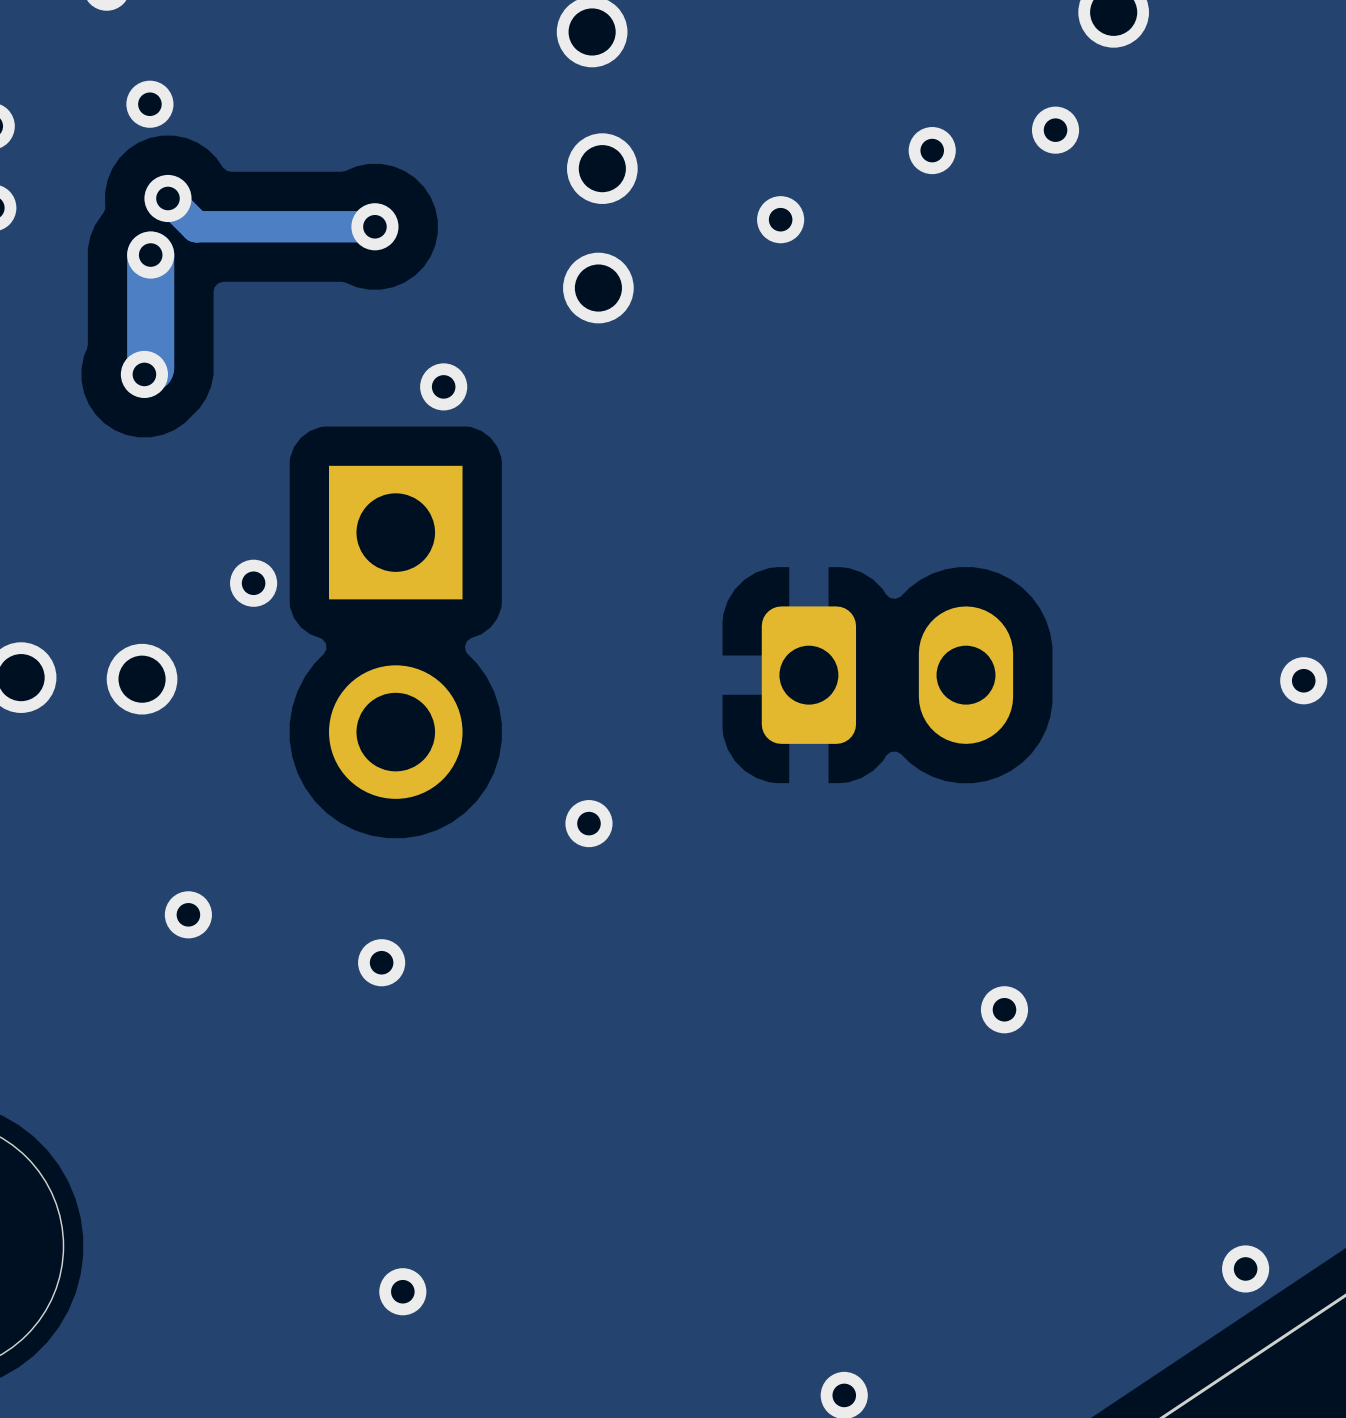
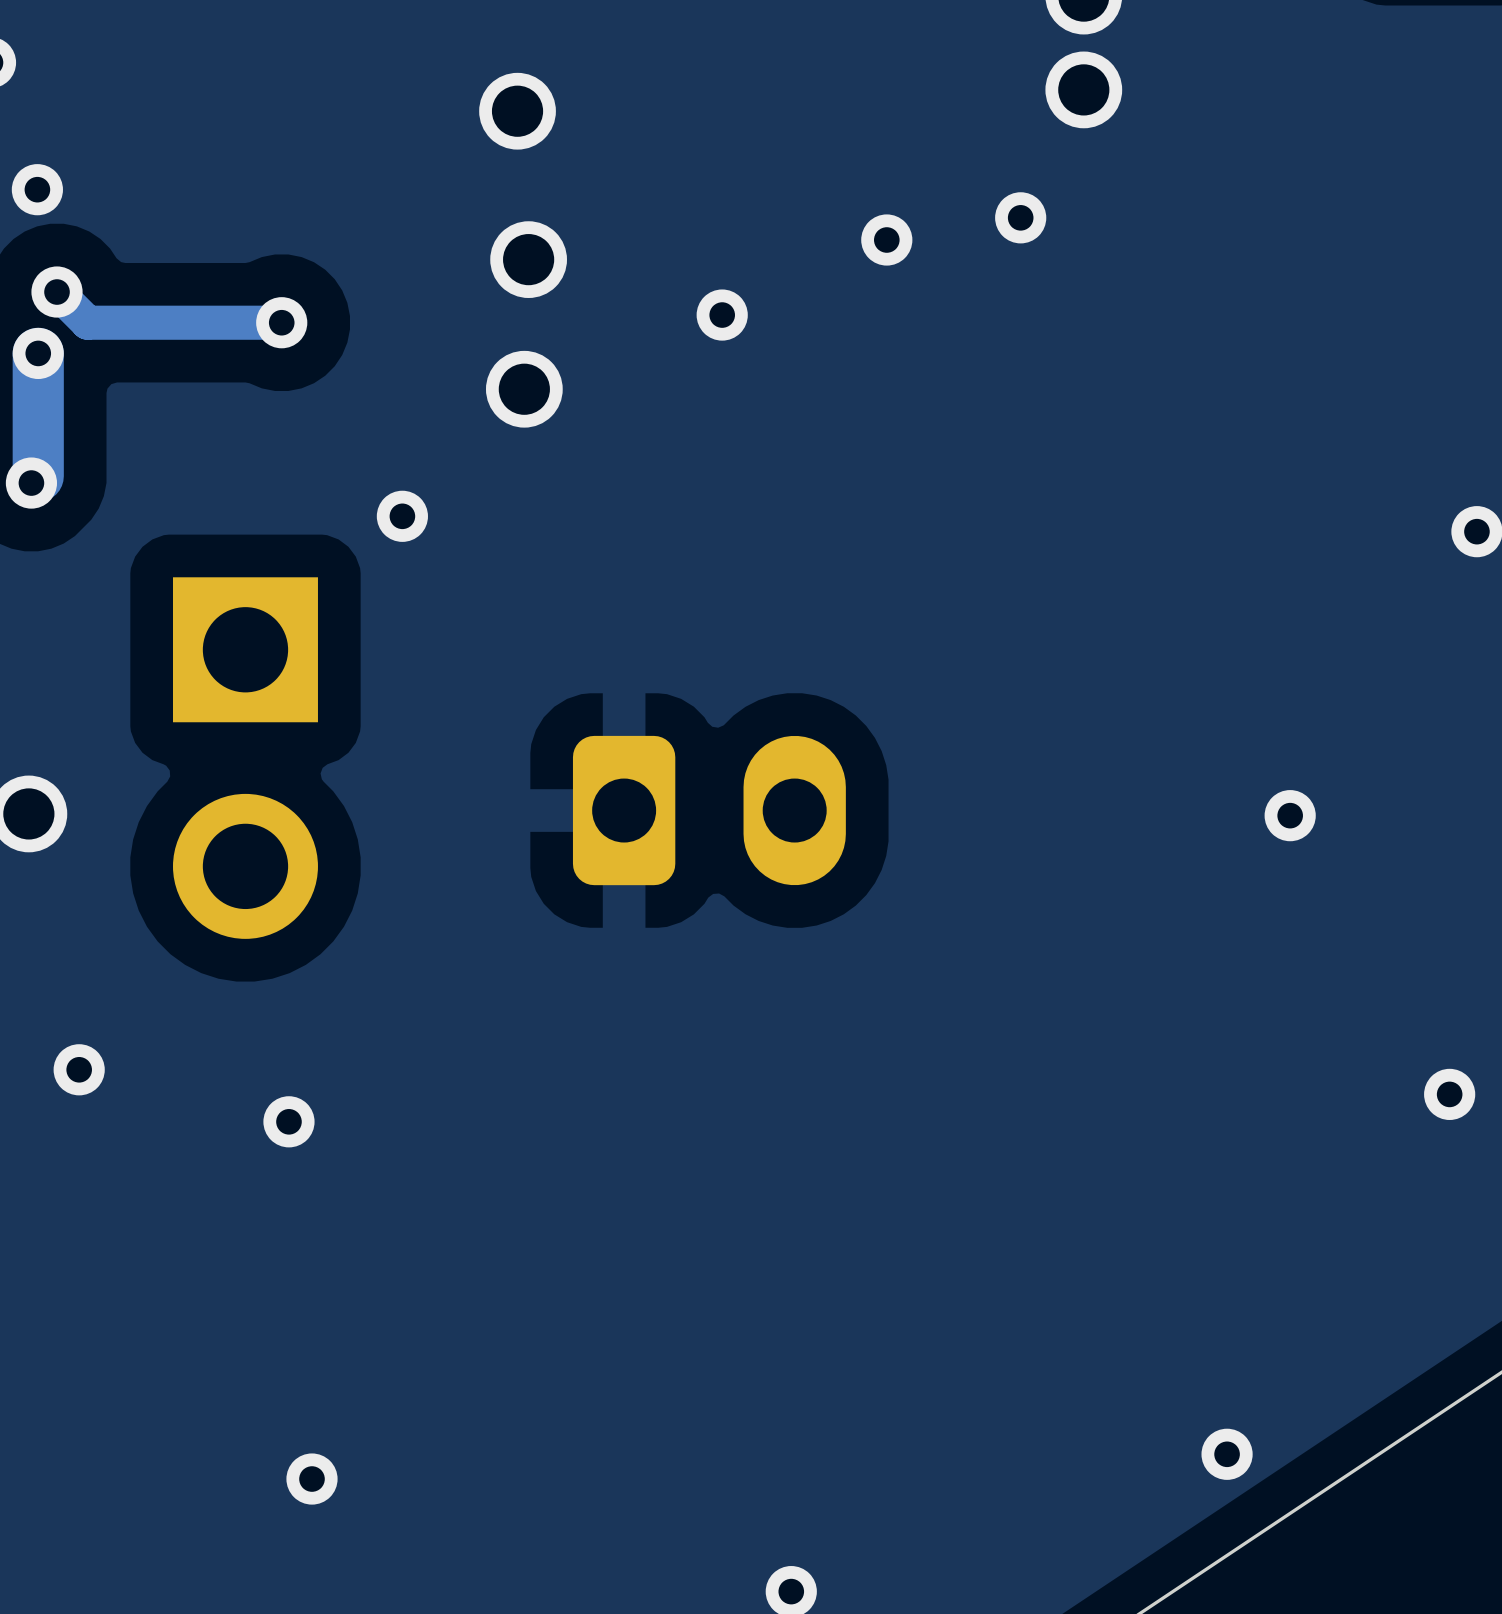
via position: (443, 386) -> (402, 516)
via: (253, 583) -> none
part position: (395, 632) -> (245, 758)
part position: (887, 675) -> (709, 810)
via: (588, 823) -> none
via: (1004, 1009) -> none

